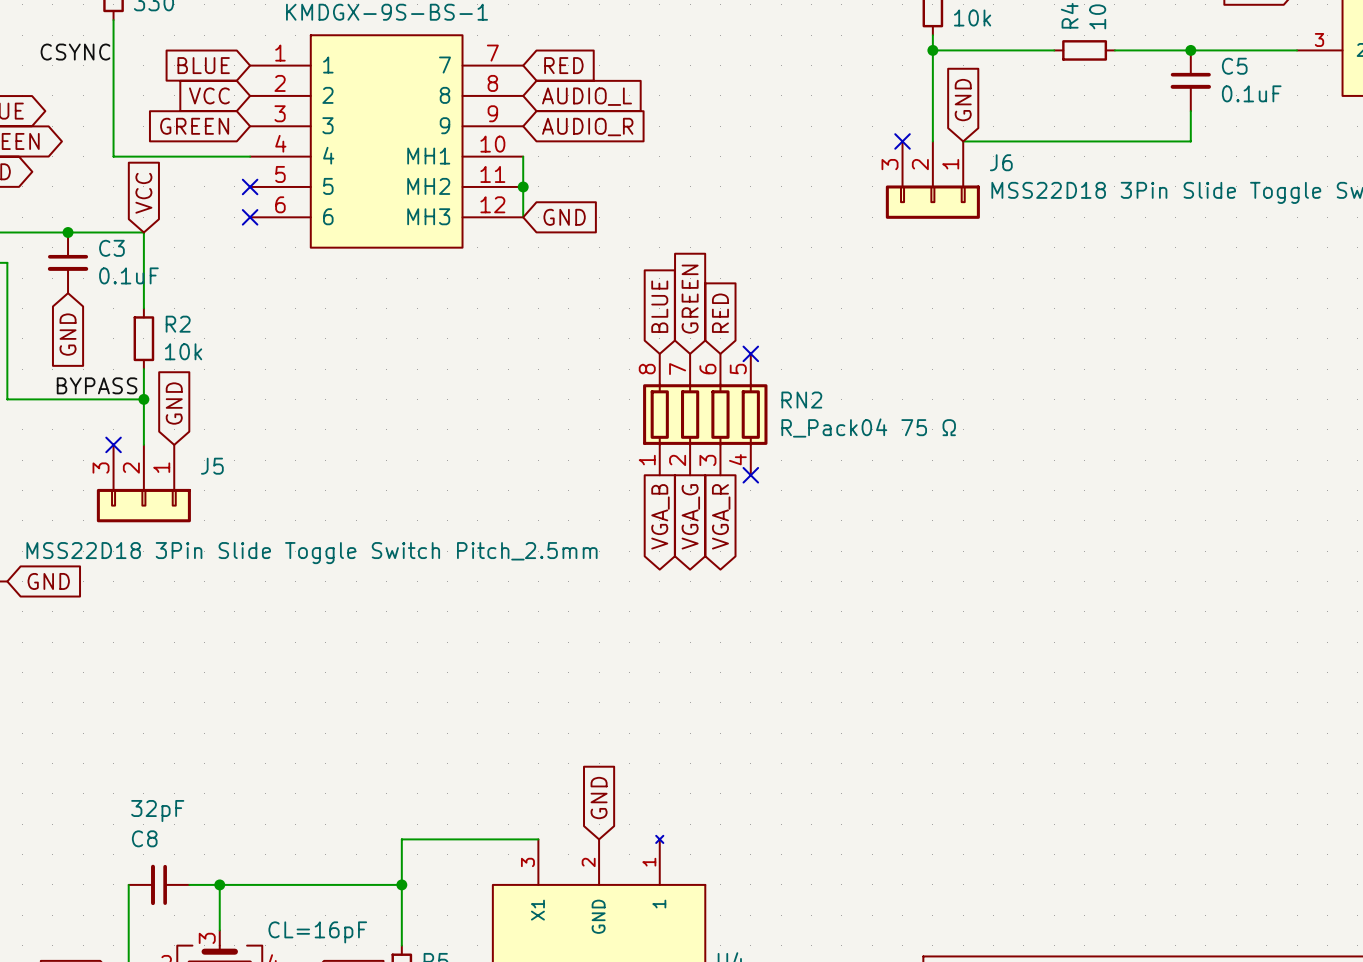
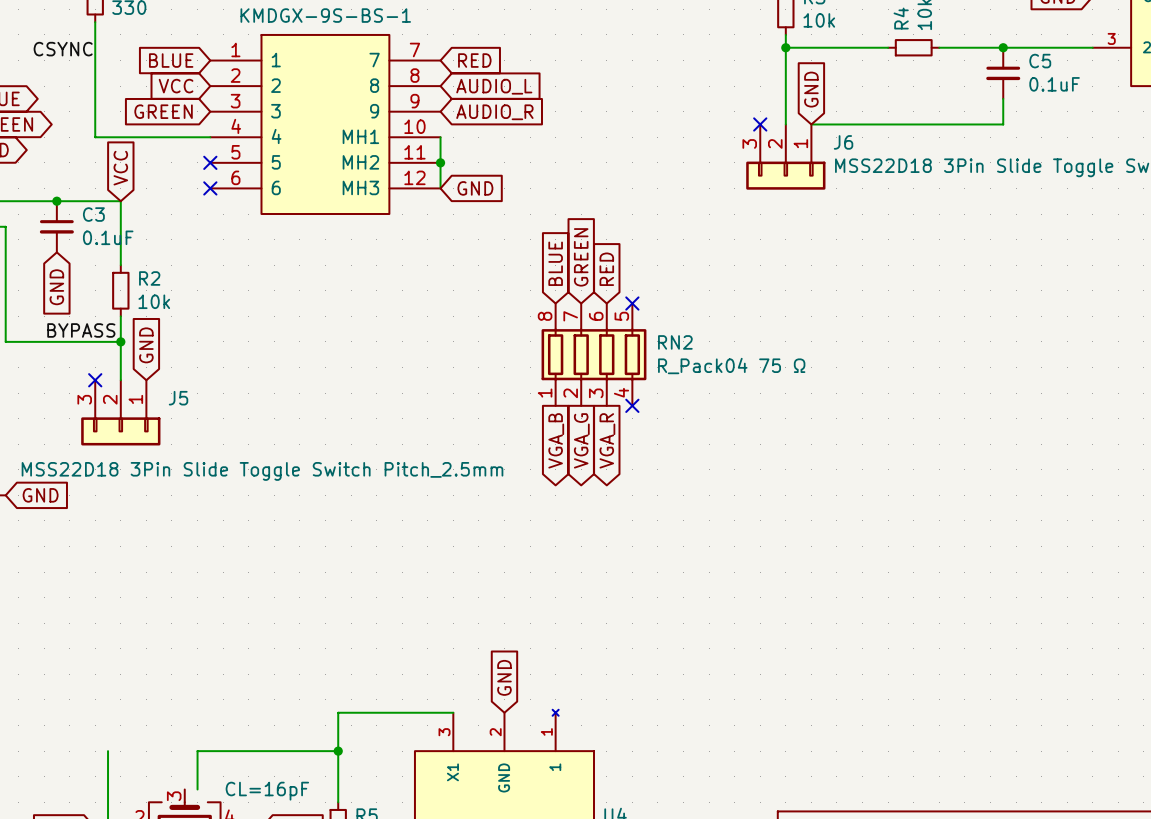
C8: 32pF (159, 884) -> none
wire: (189, 884) (234, 884) -> (197, 789) (197, 751)
wire: (219, 884) (219, 930) -> none
junction: (219, 884) -> none

